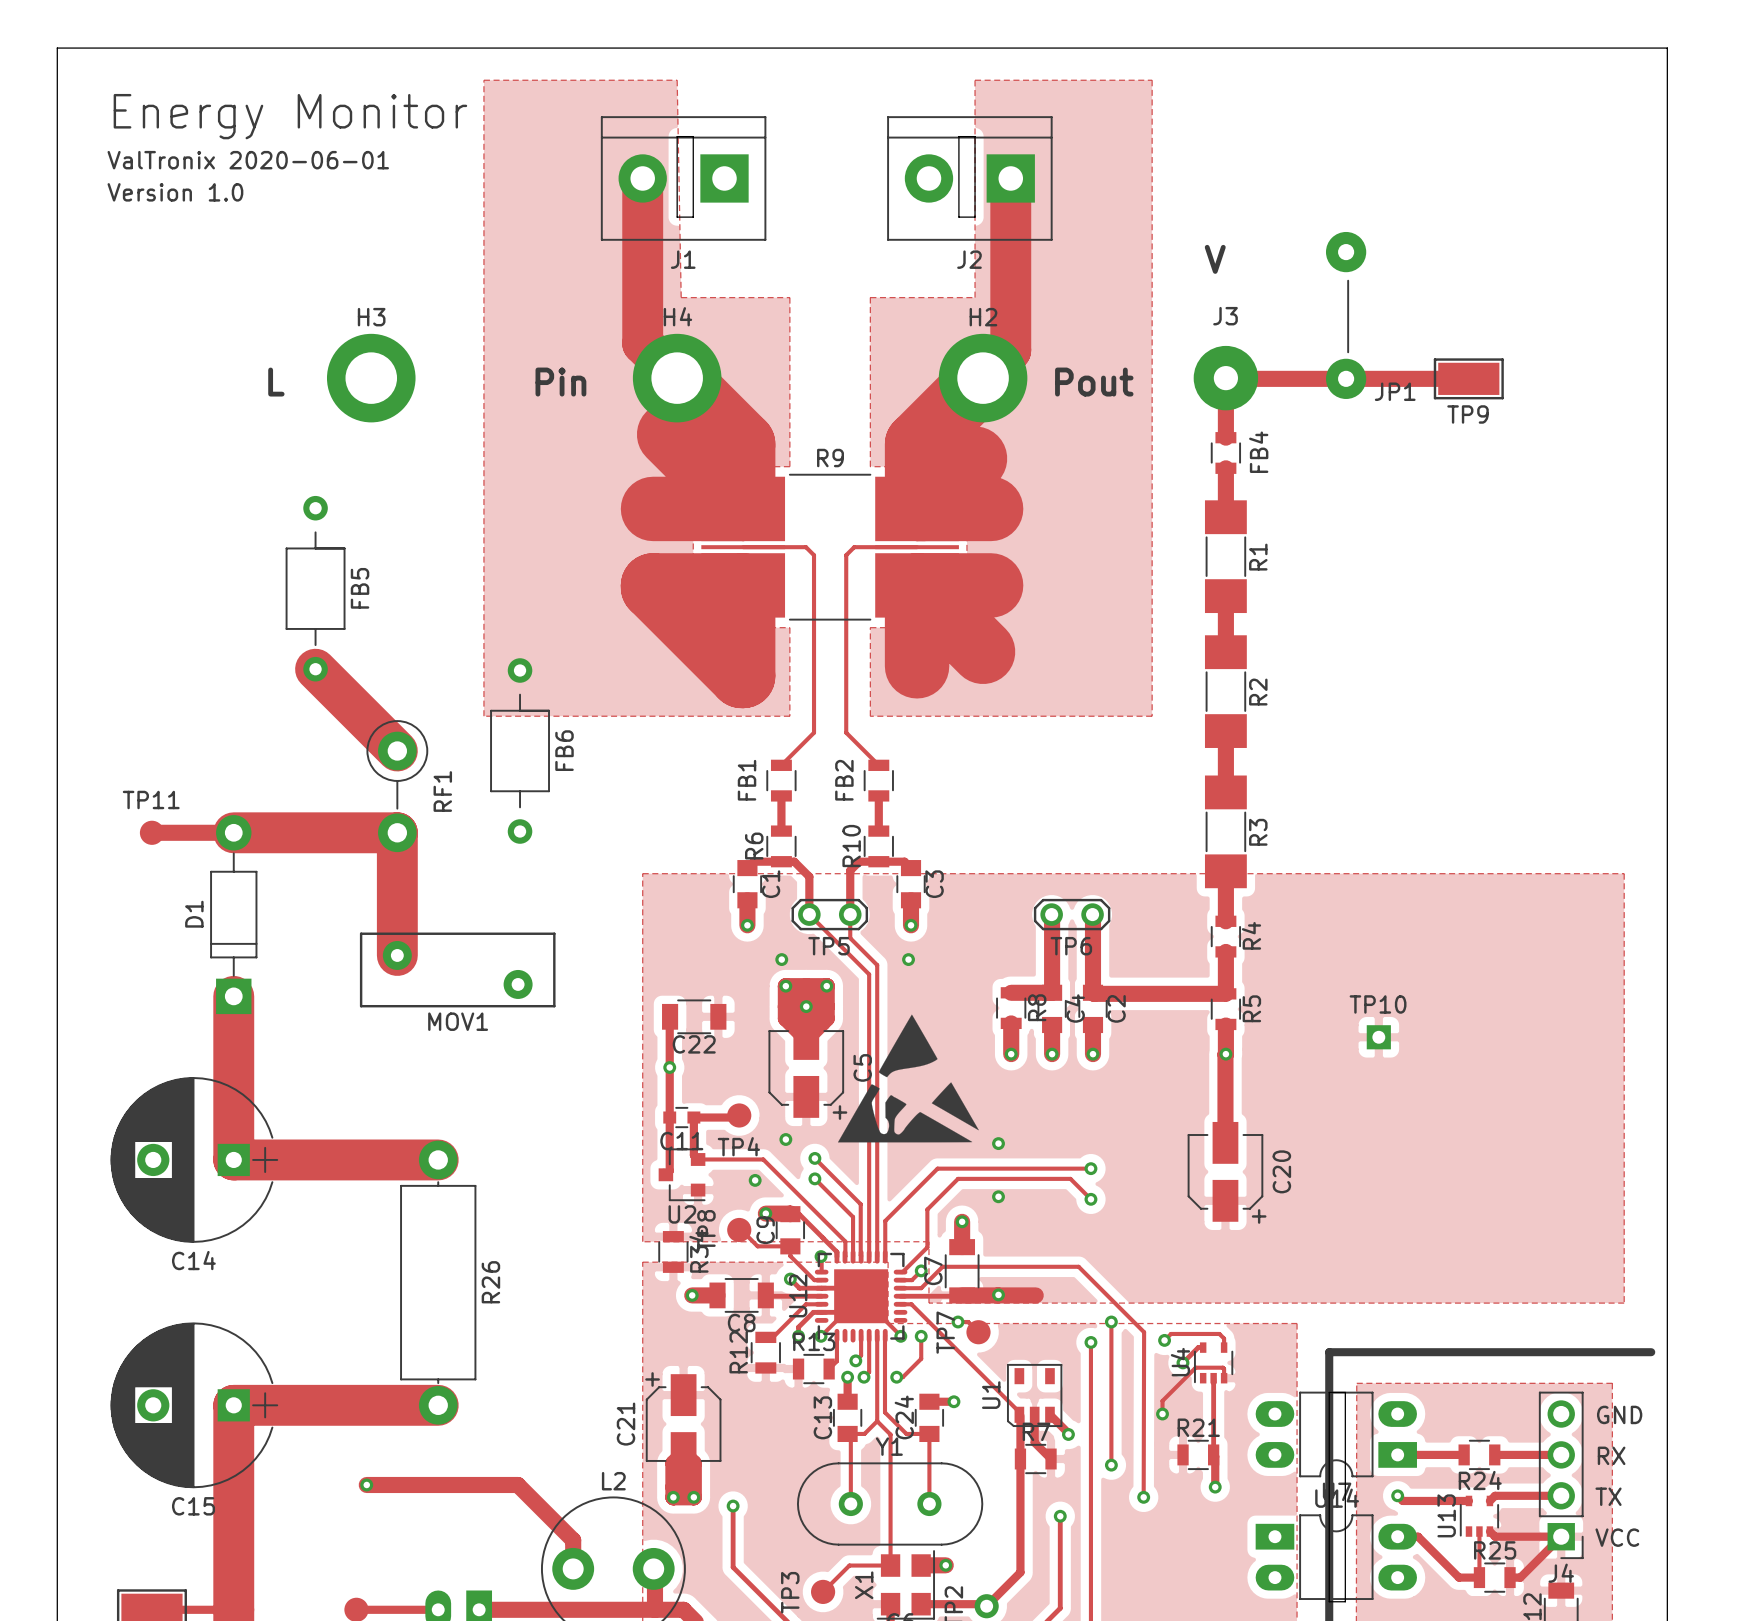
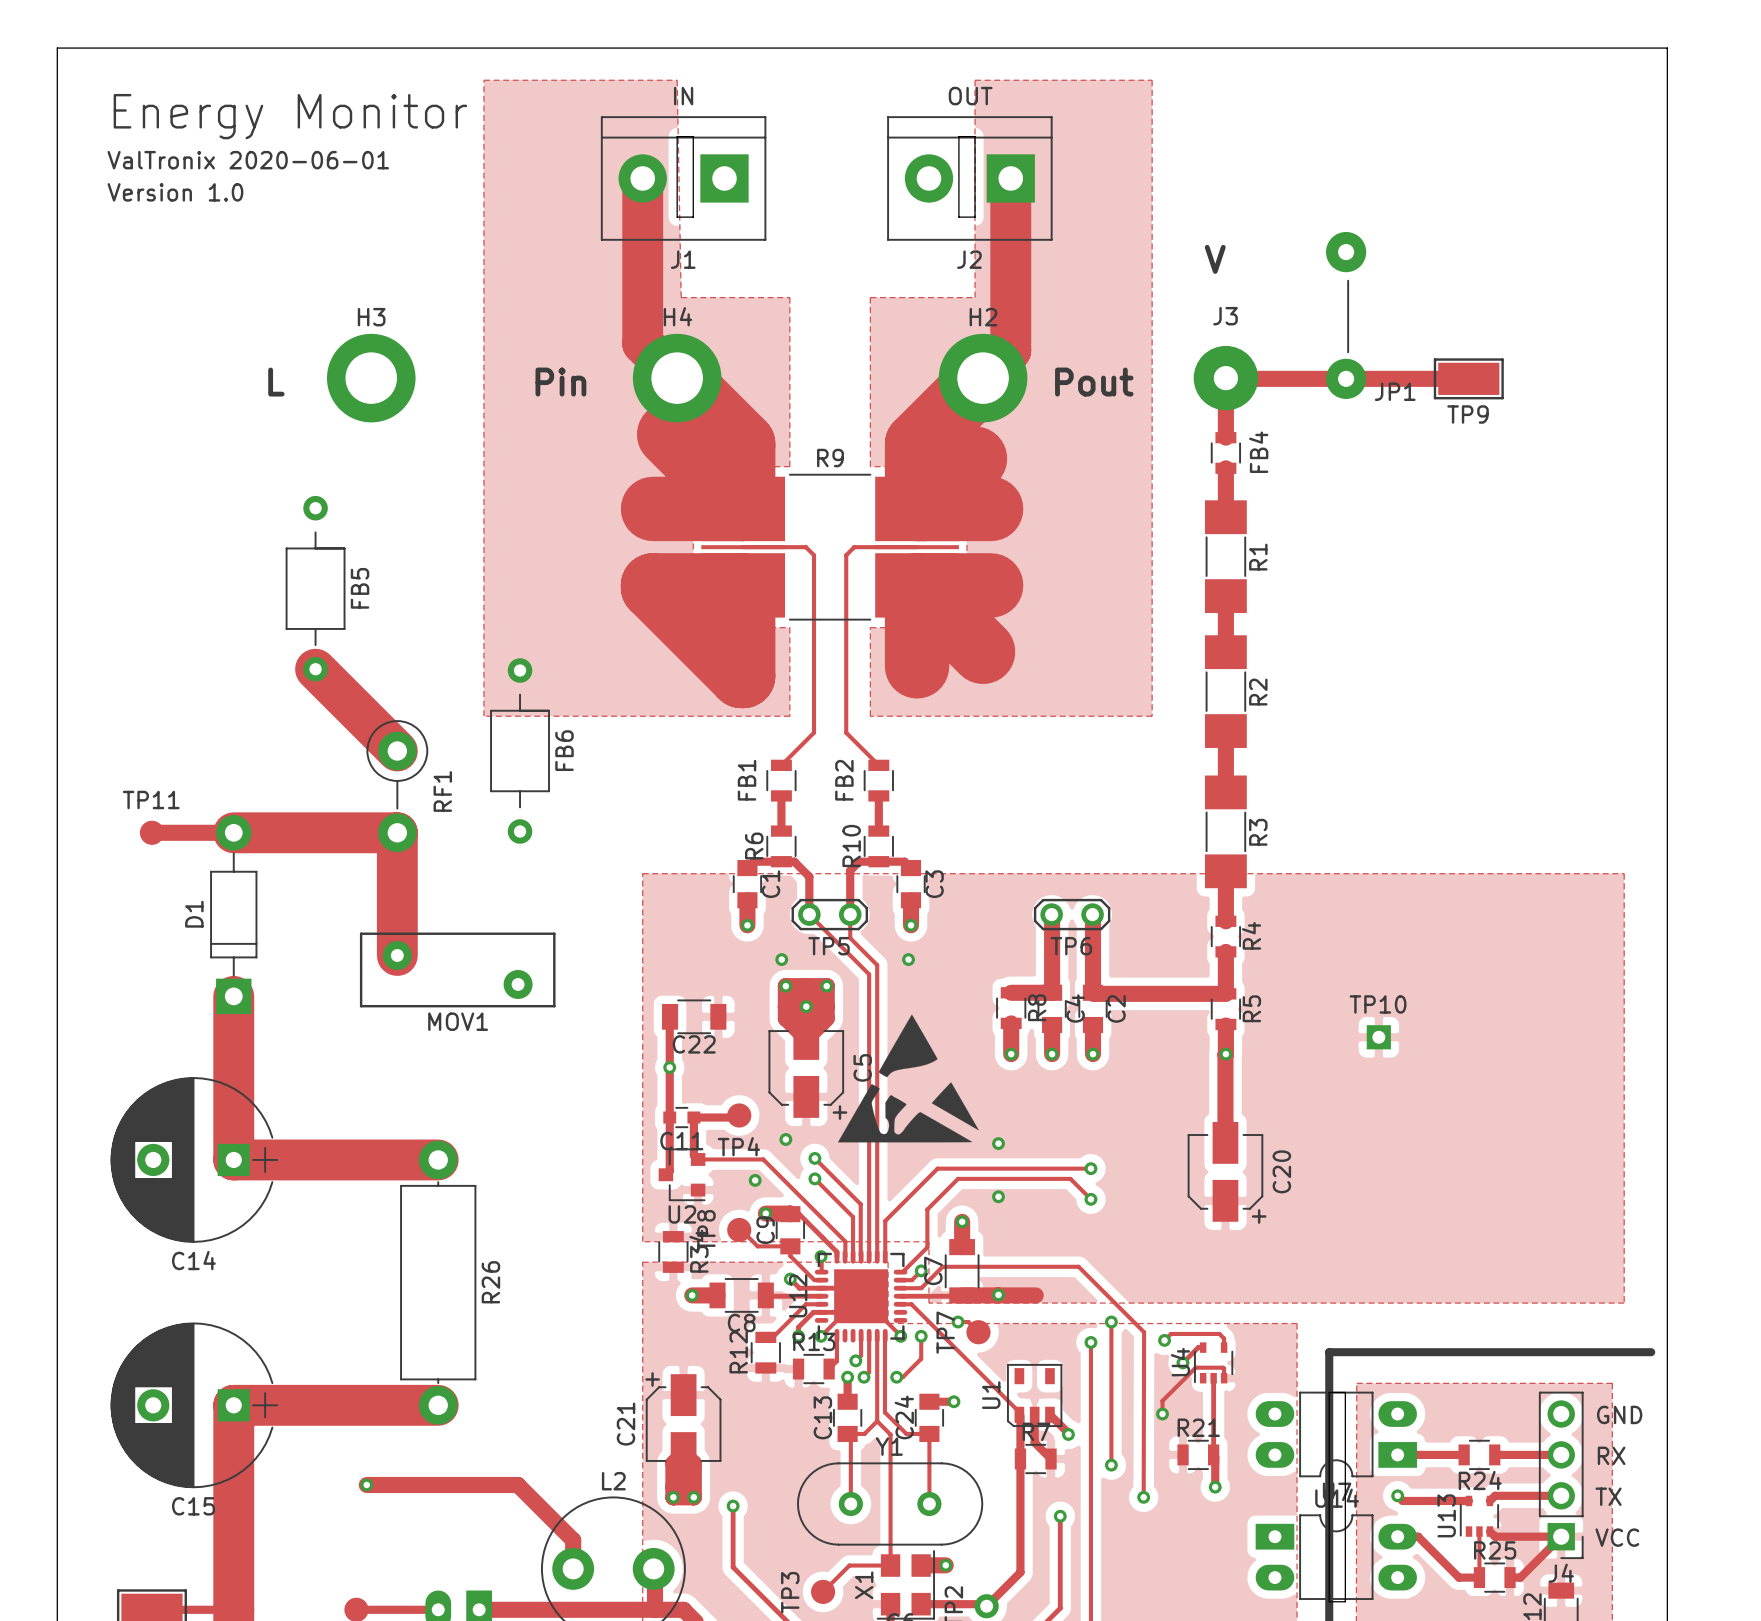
J1 value: none -> IN (683, 96)
J2 value: none -> OUT (970, 96)

